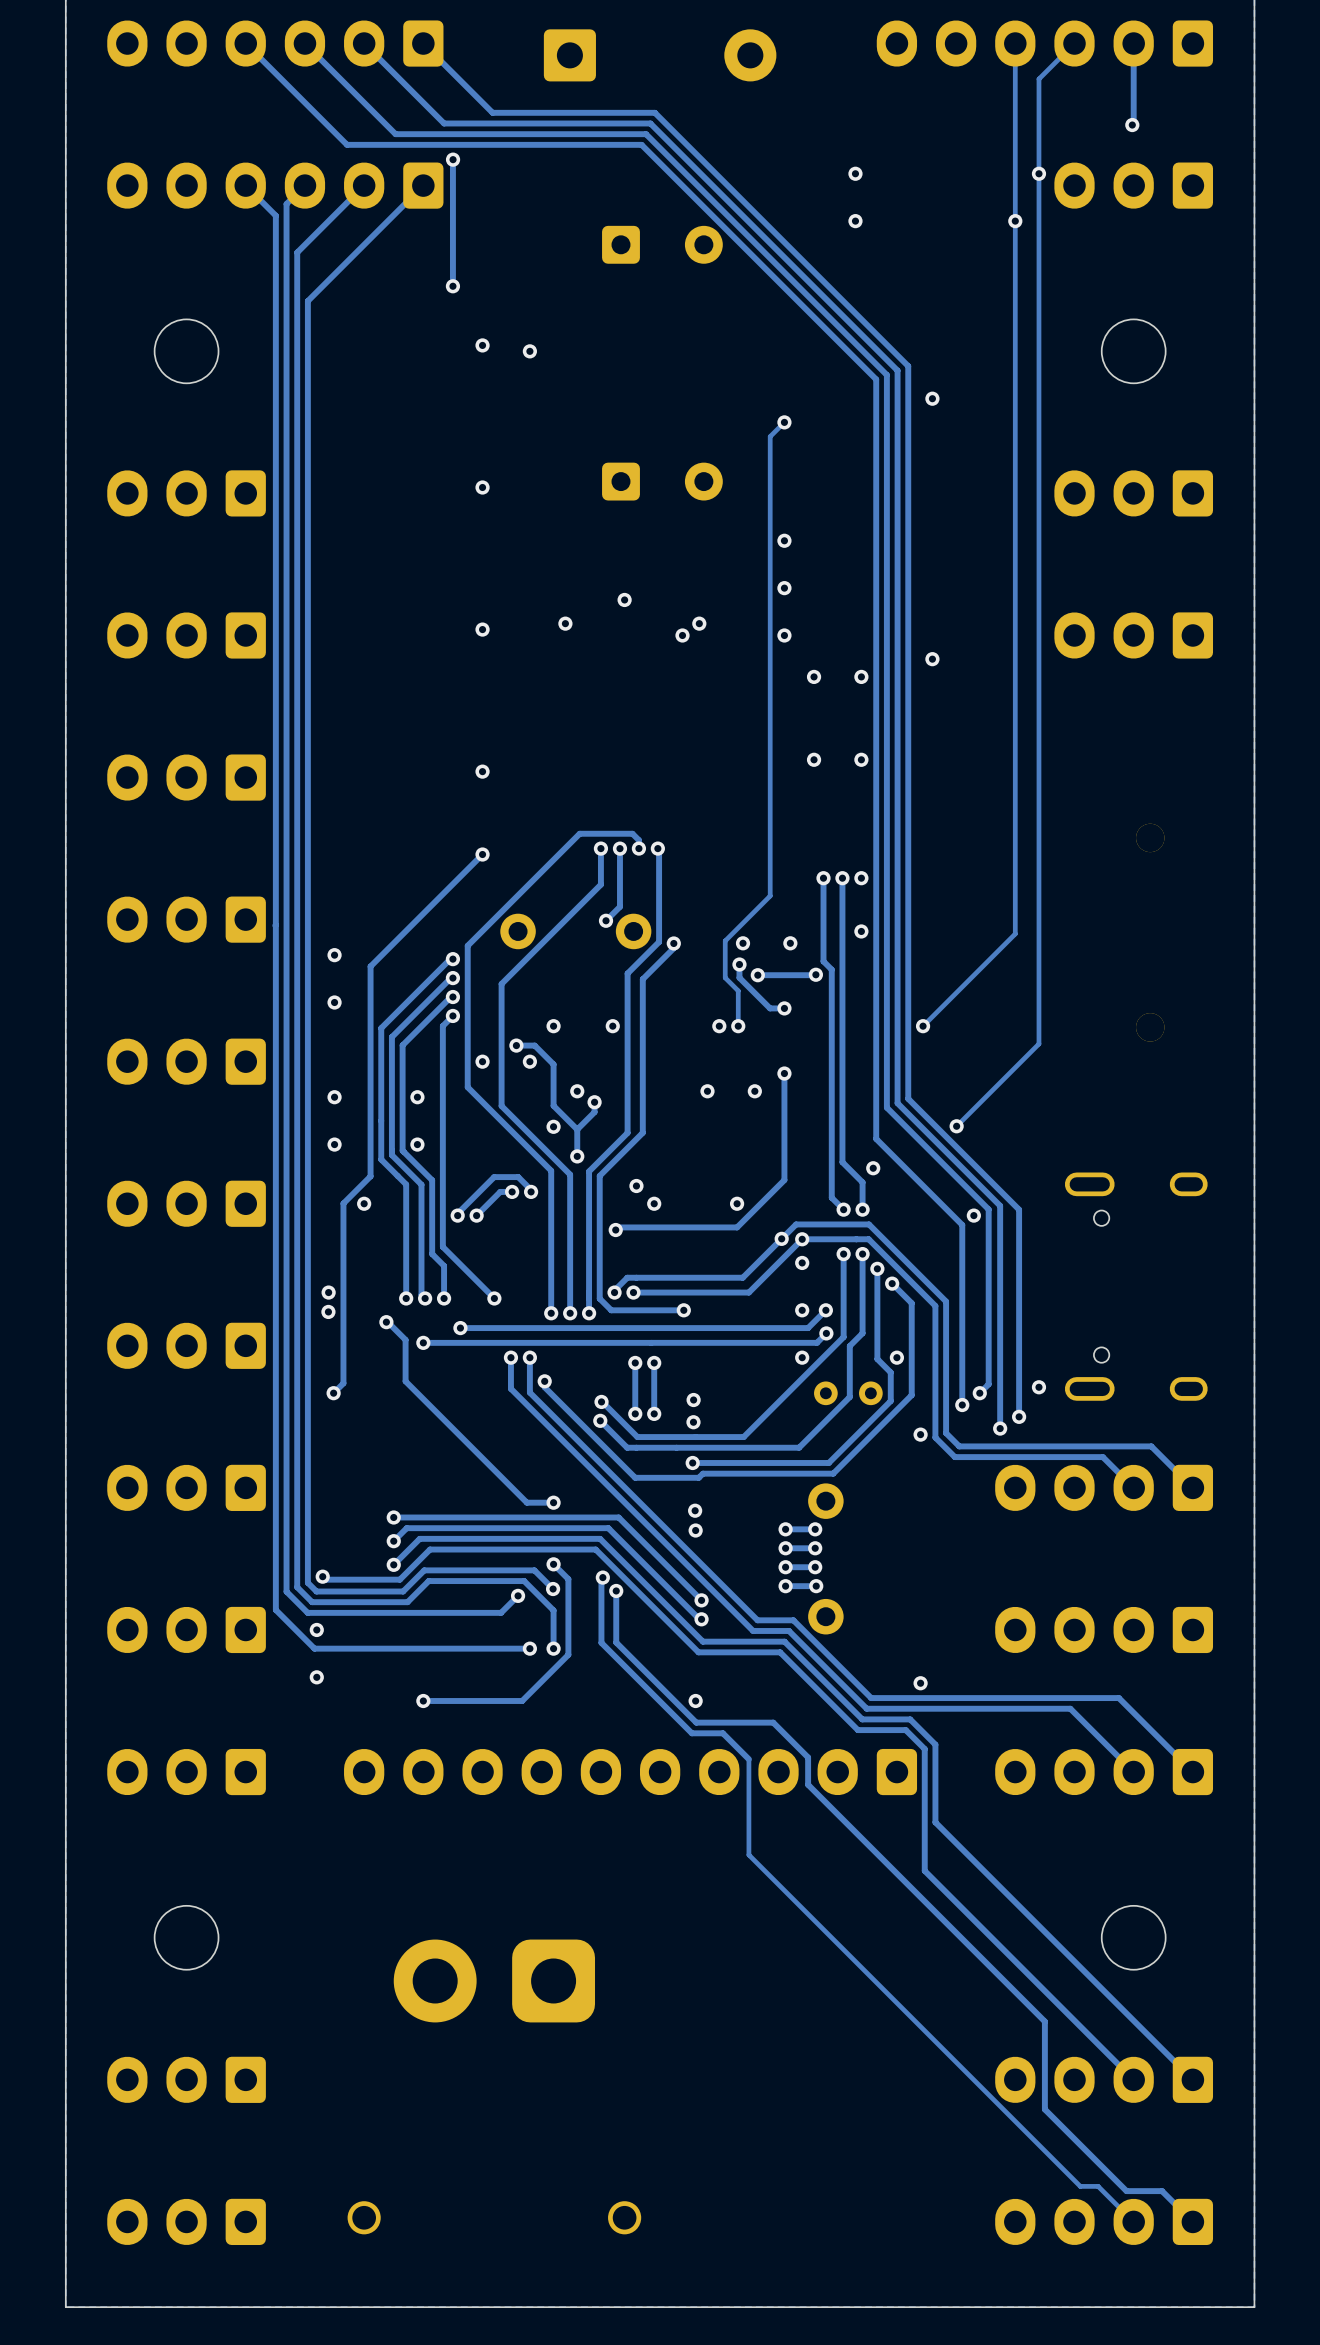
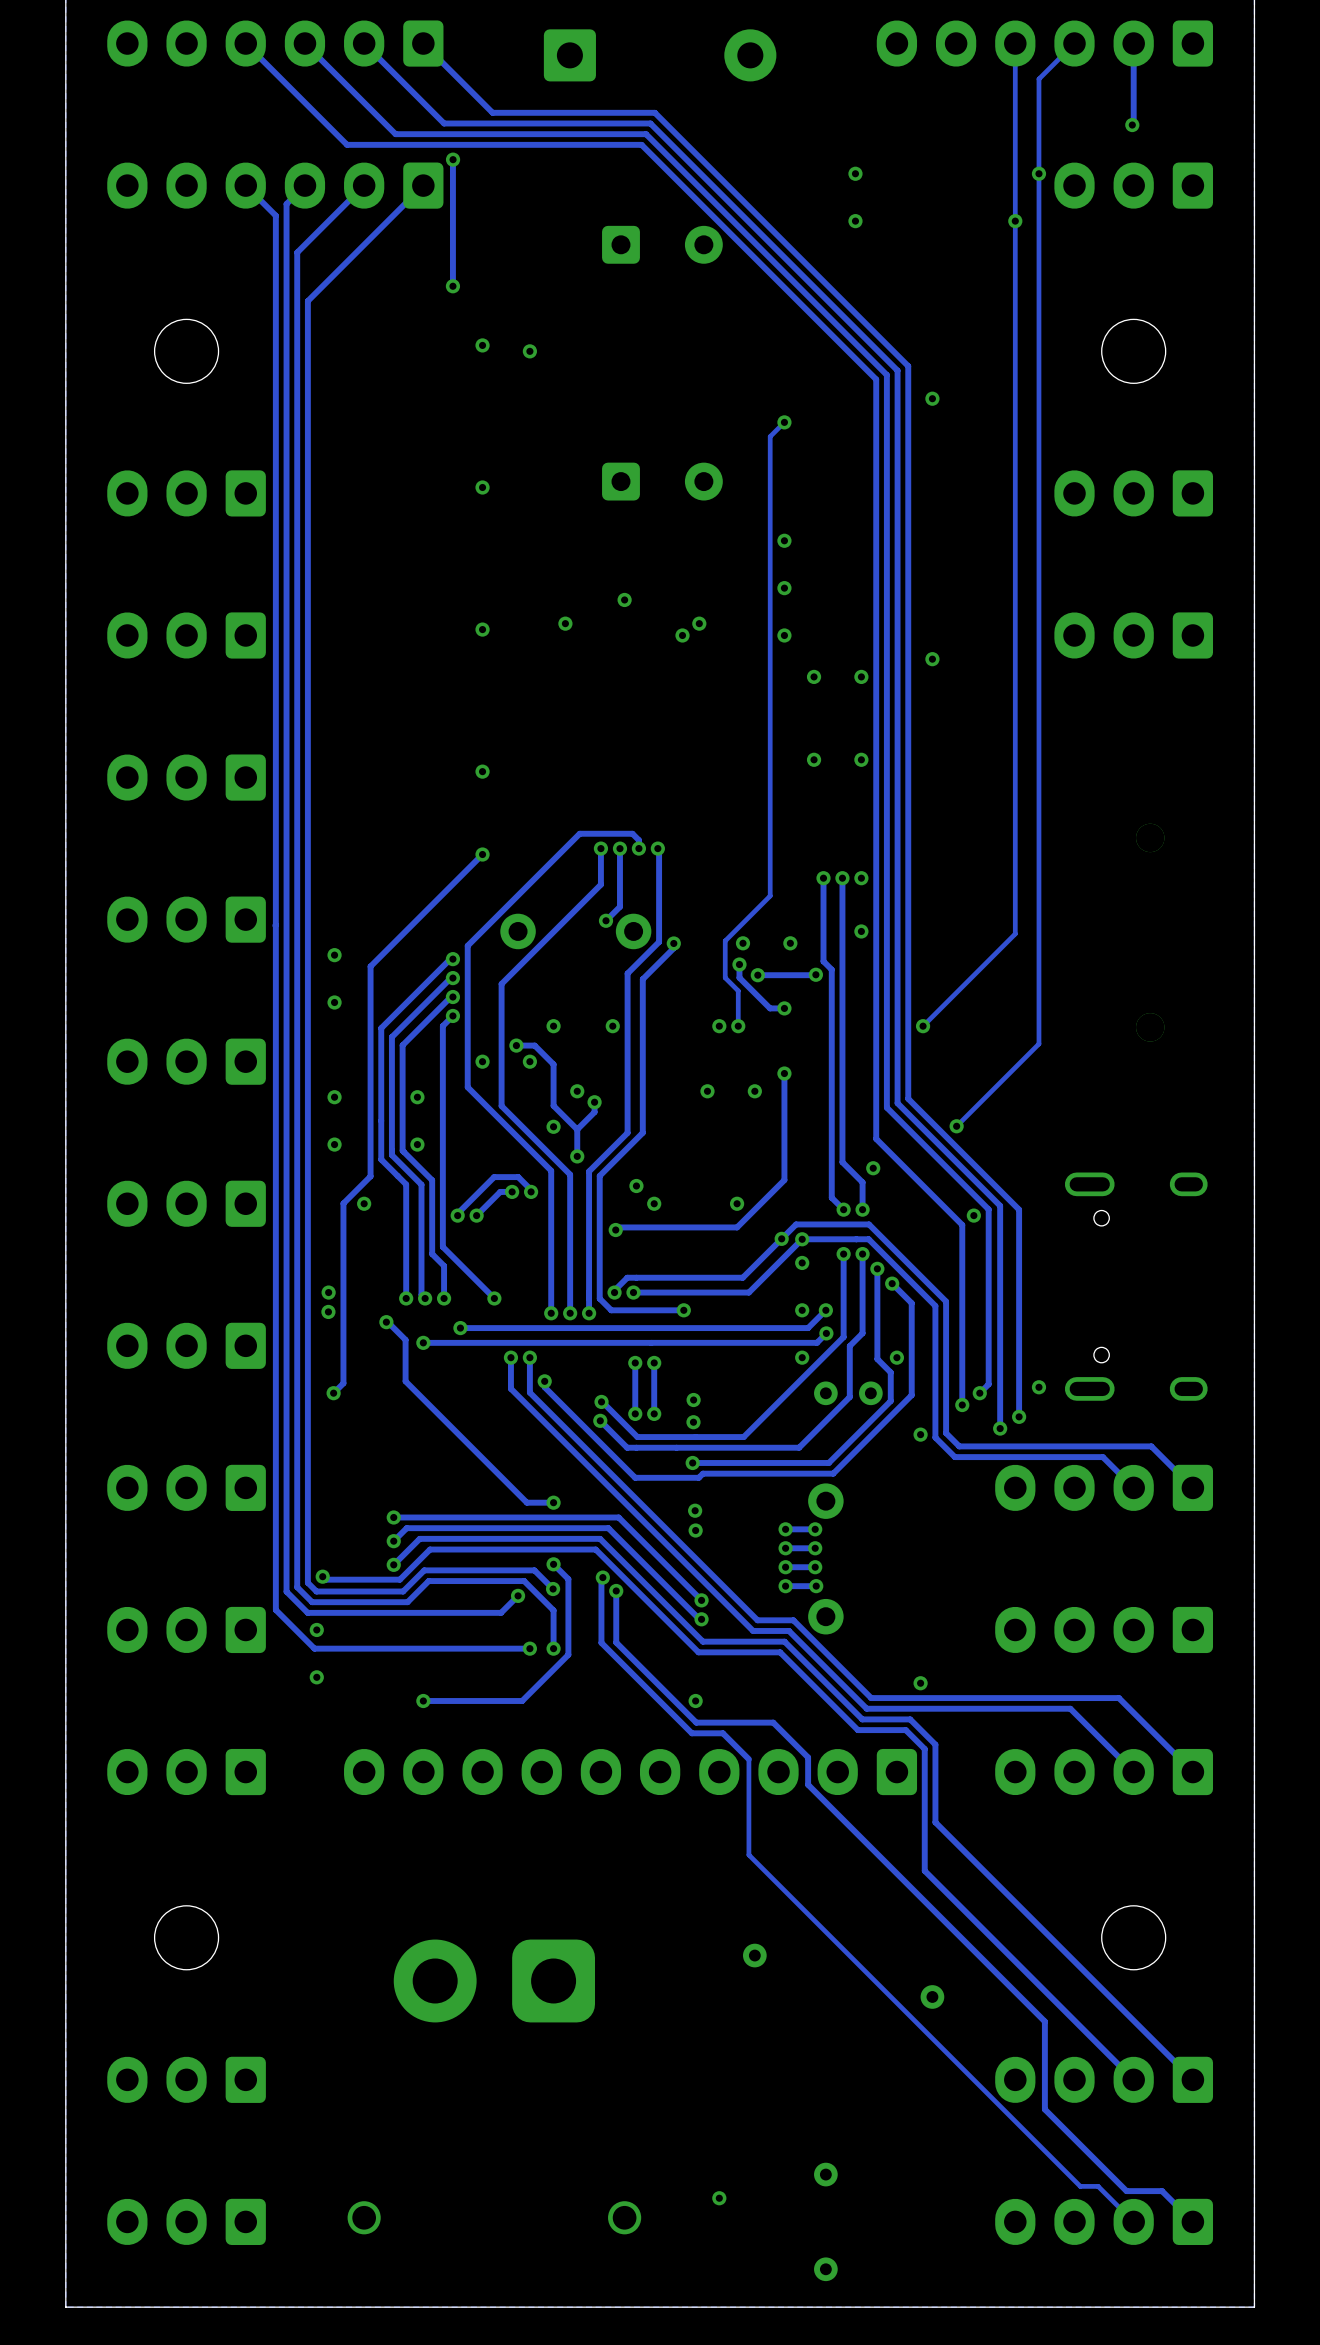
via: none -> (754, 1955)
via: none -> (932, 1996)
via: none -> (825, 2174)
via: none -> (719, 2198)
via: none -> (825, 2269)

